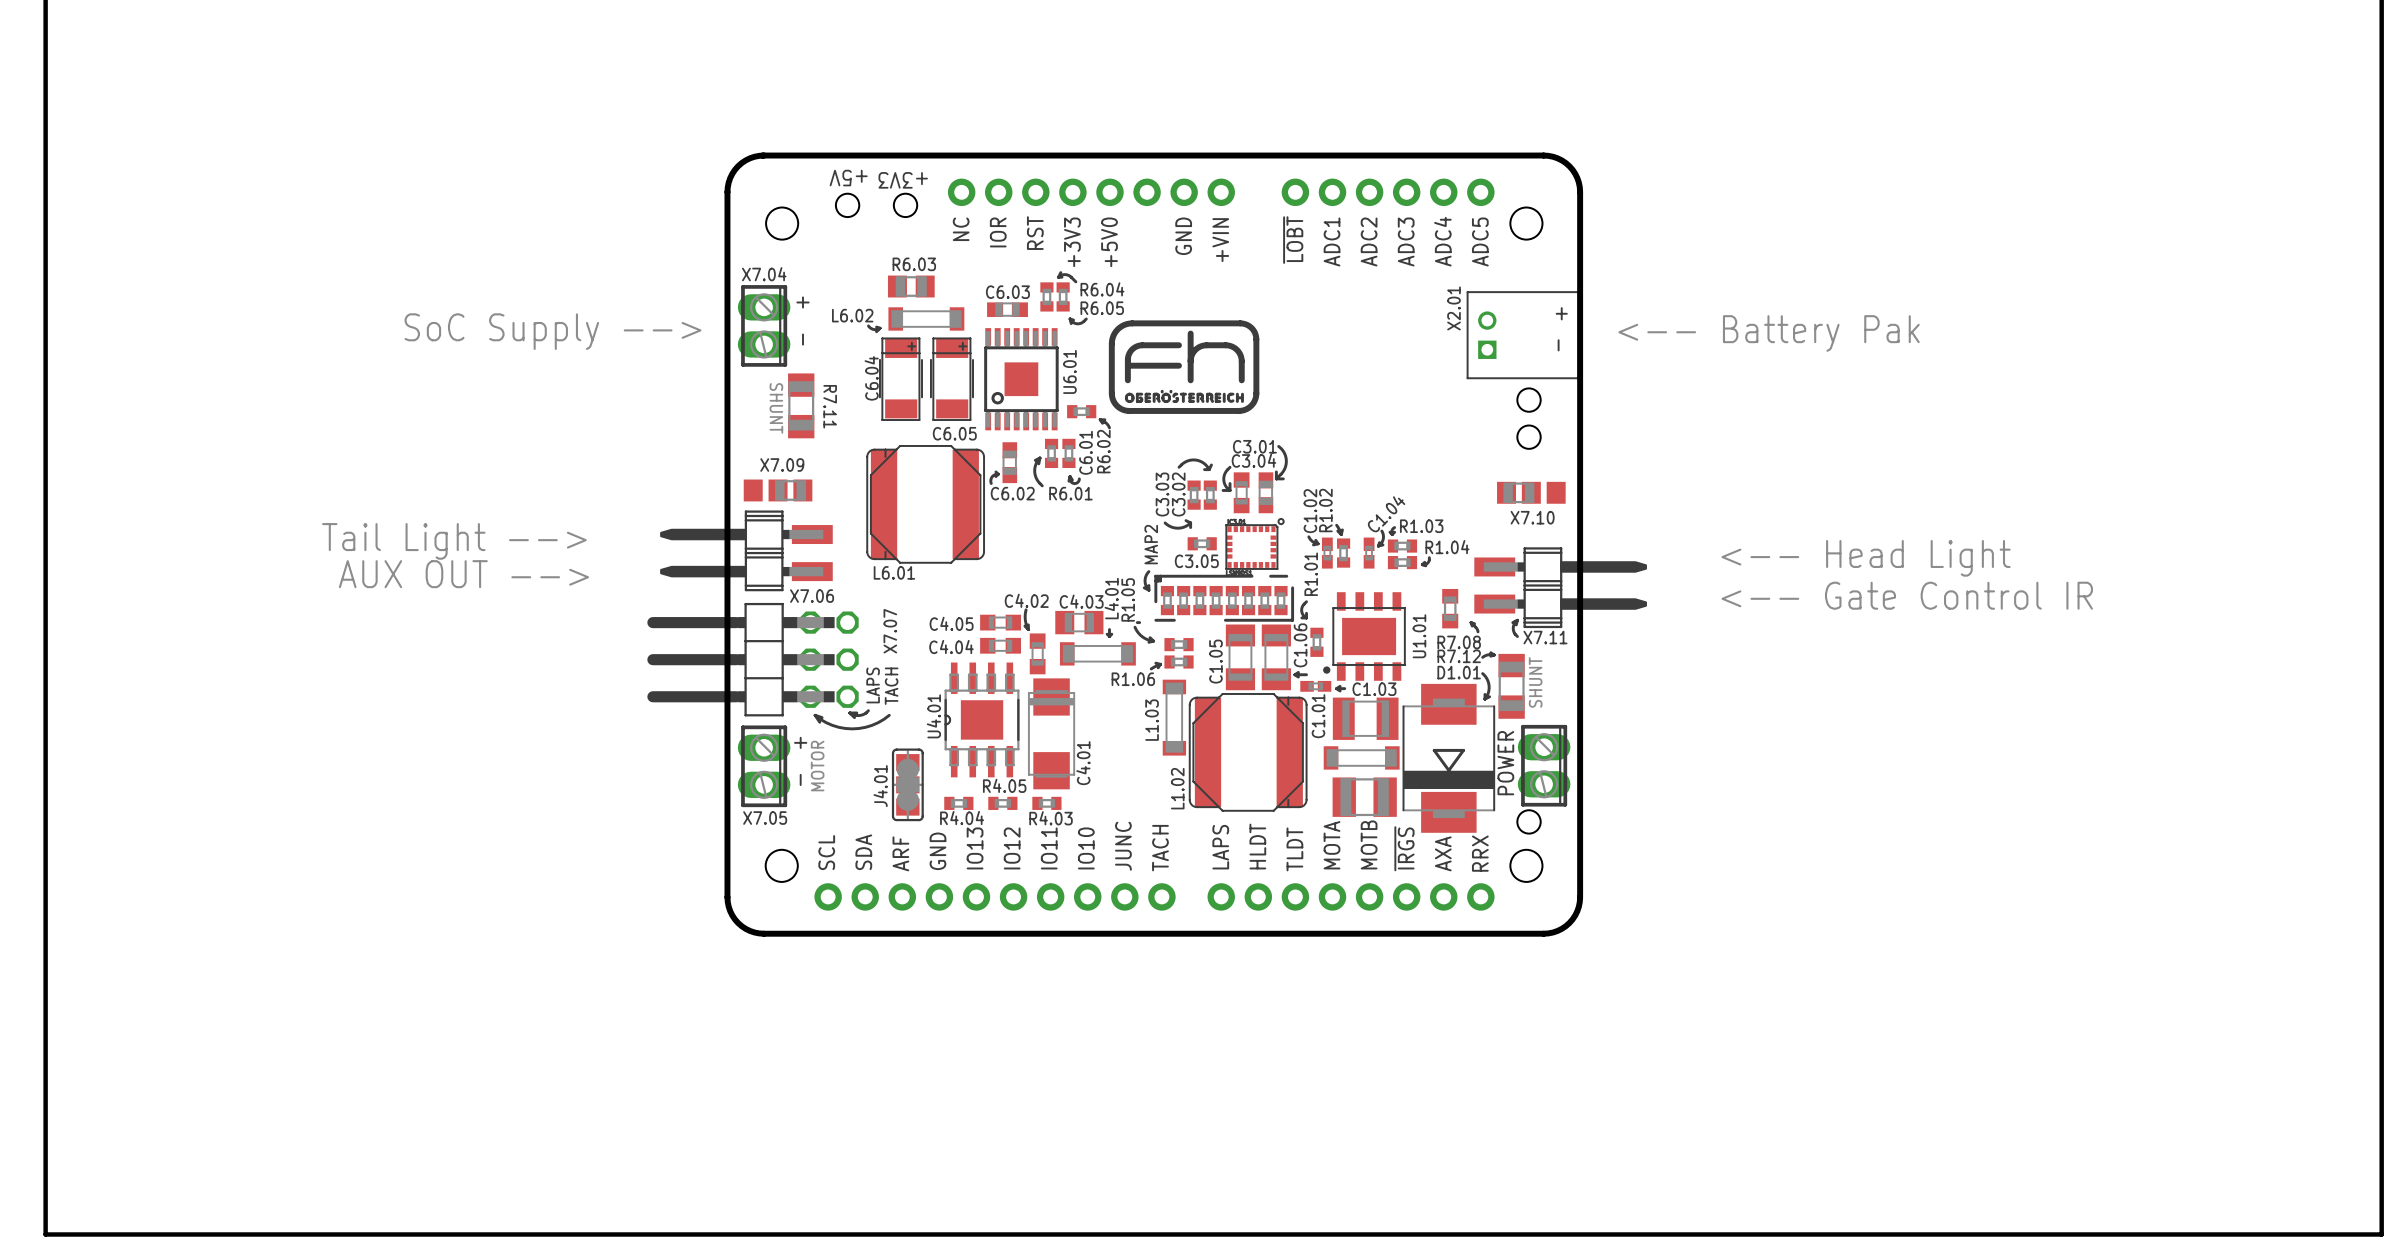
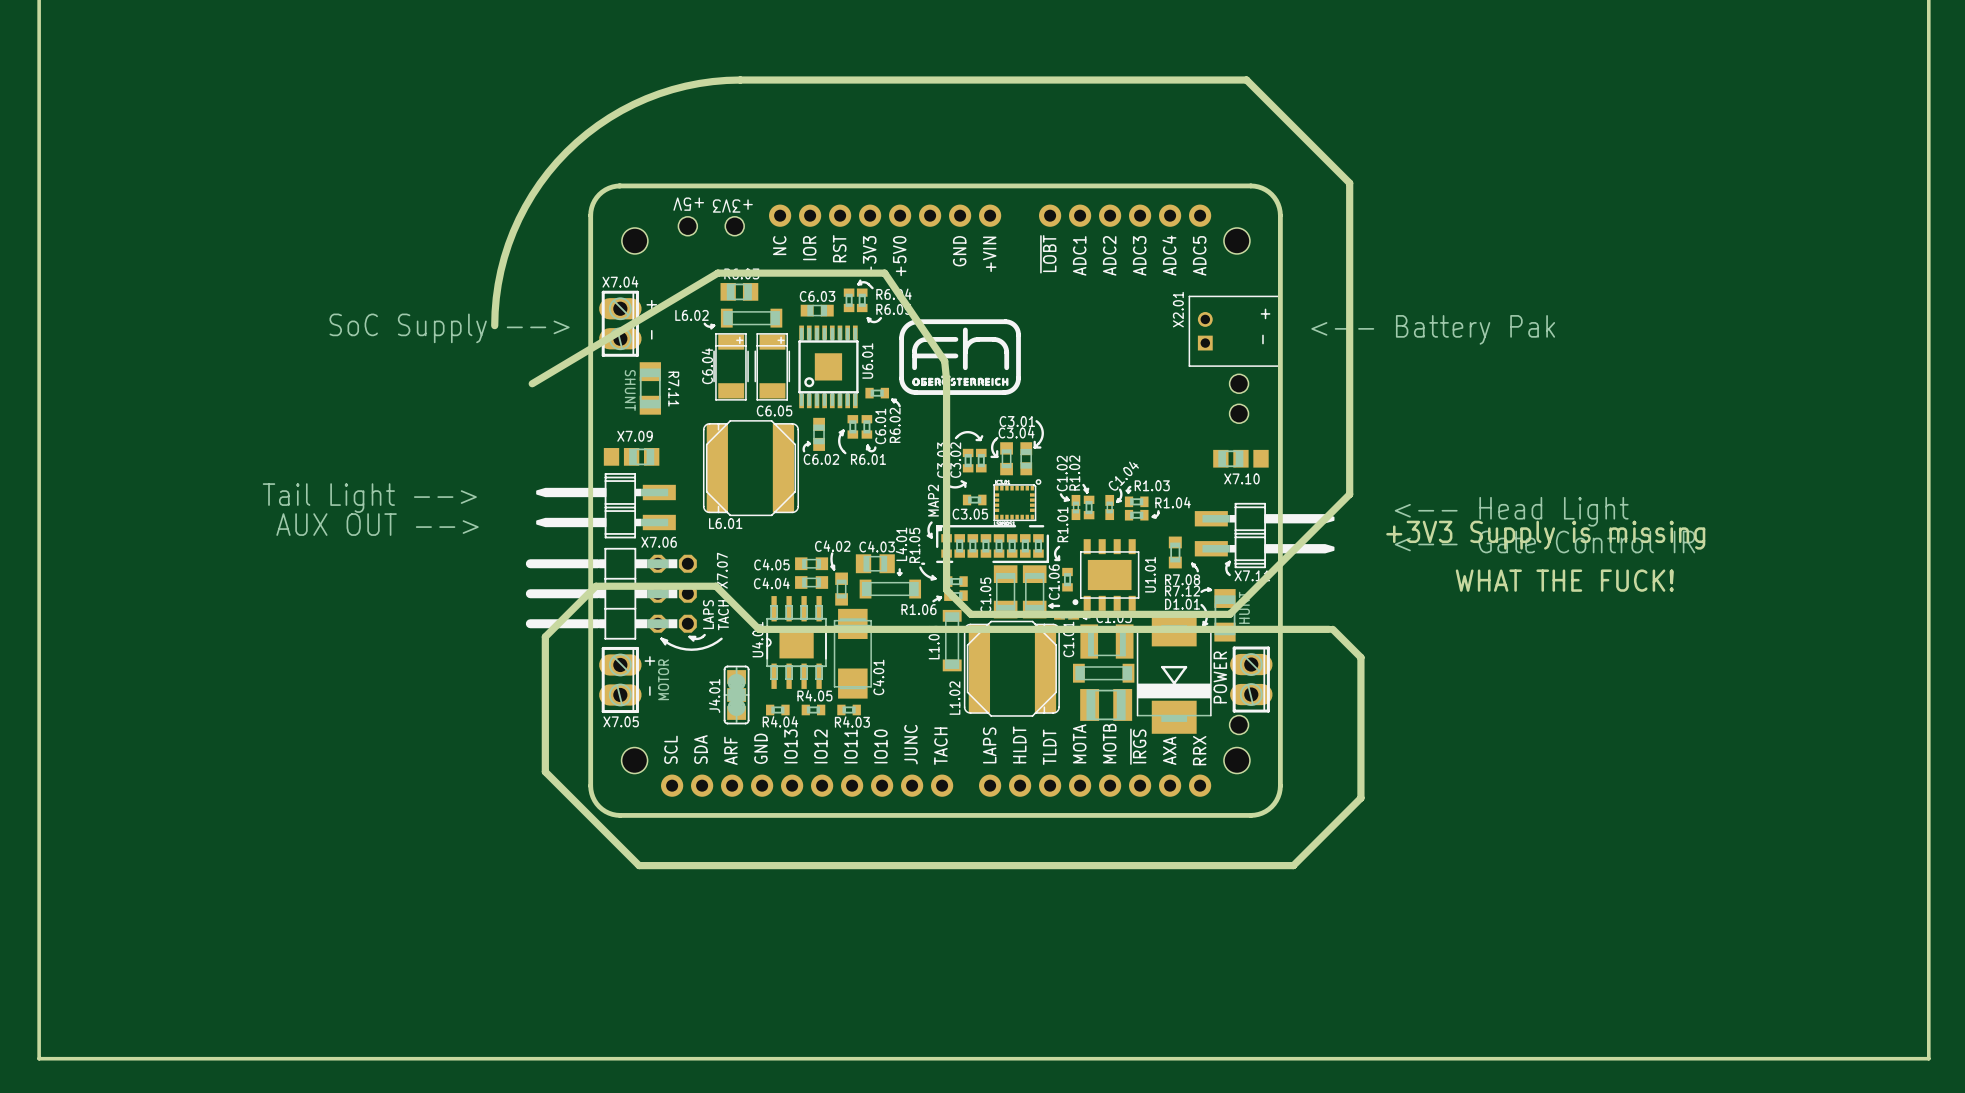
board edge: none -> (494, 325) (498, 284) (508, 244) (525, 206) (540, 183) (557, 161) (587, 133) (621, 110) (659, 93) (699, 83) (740, 80) (1246, 80) (1349, 183) (1349, 494) (1229, 614) (970, 614) (946, 589) (946, 380) (944, 361) (884, 273) (717, 273) (532, 383)
text: none -> +3V3 Supply is missing (1545, 535)
text: none -> WHAT THE FUCK! (1564, 580)
board edge: none -> (1329, 629) (759, 629) (715, 586) (595, 586) (545, 636) (545, 771) (639, 865) (1293, 865) (1360, 798) (1360, 657) (1332, 629)

